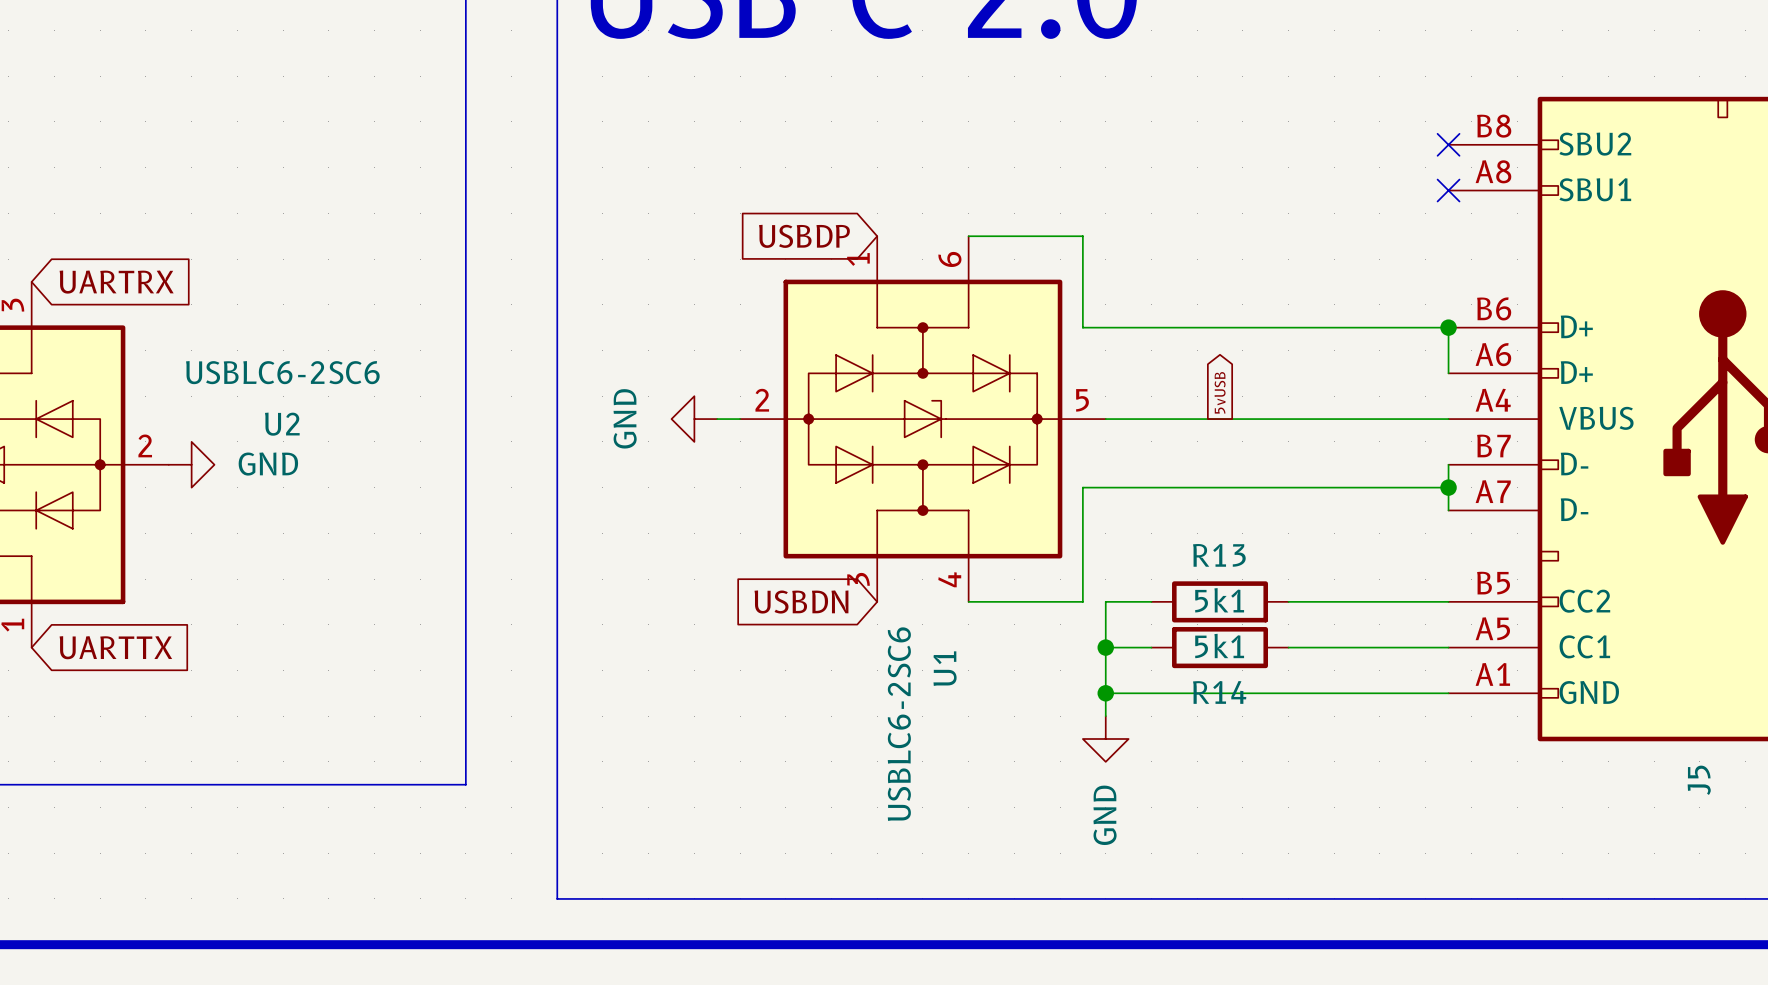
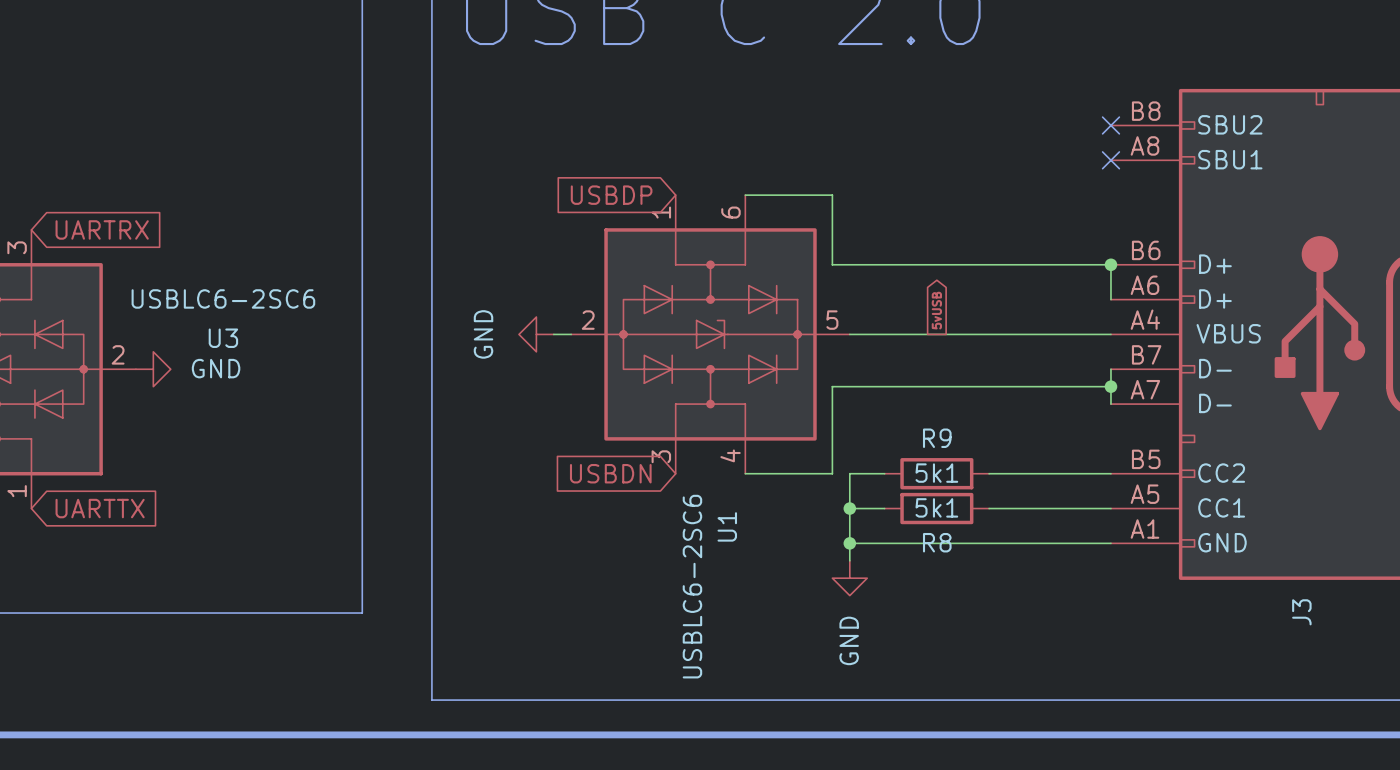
U2 name: U2 (282, 424) -> U3 (223, 338)
R13 name: R13 (1219, 555) -> R9 (937, 438)
R14 name: R14 (1219, 692) -> R8 (937, 542)
J5 name: J5 (1699, 780) -> J3 (1301, 612)

